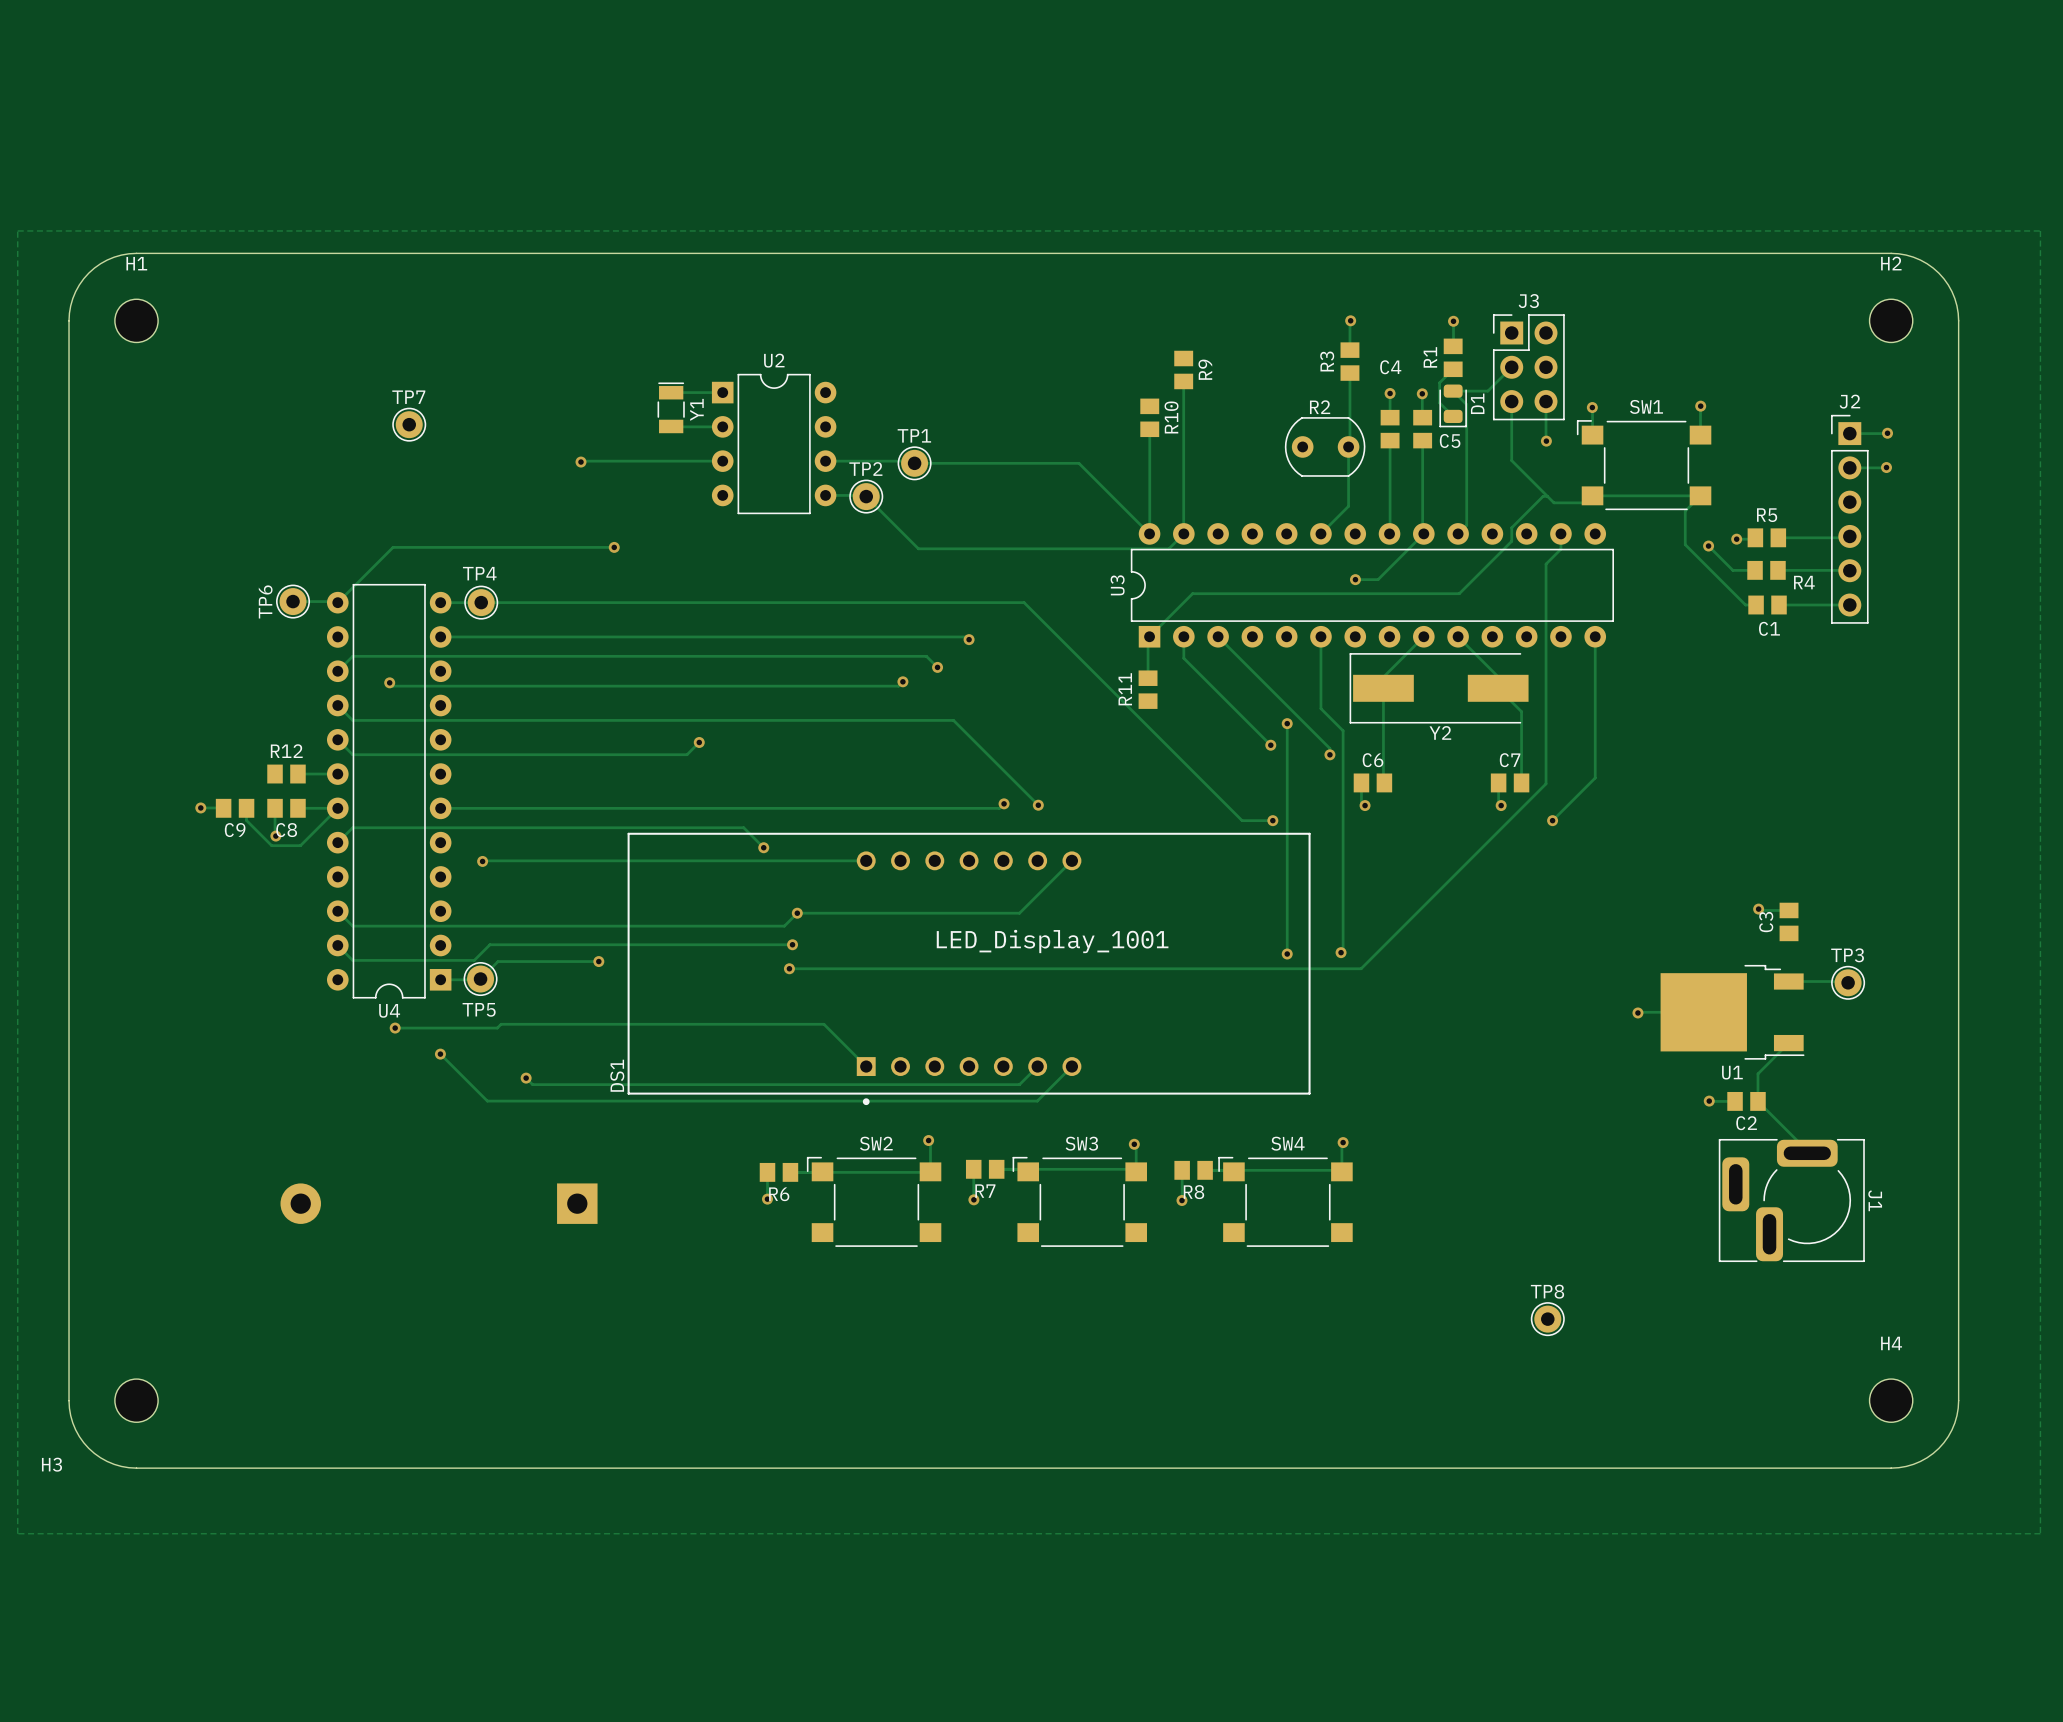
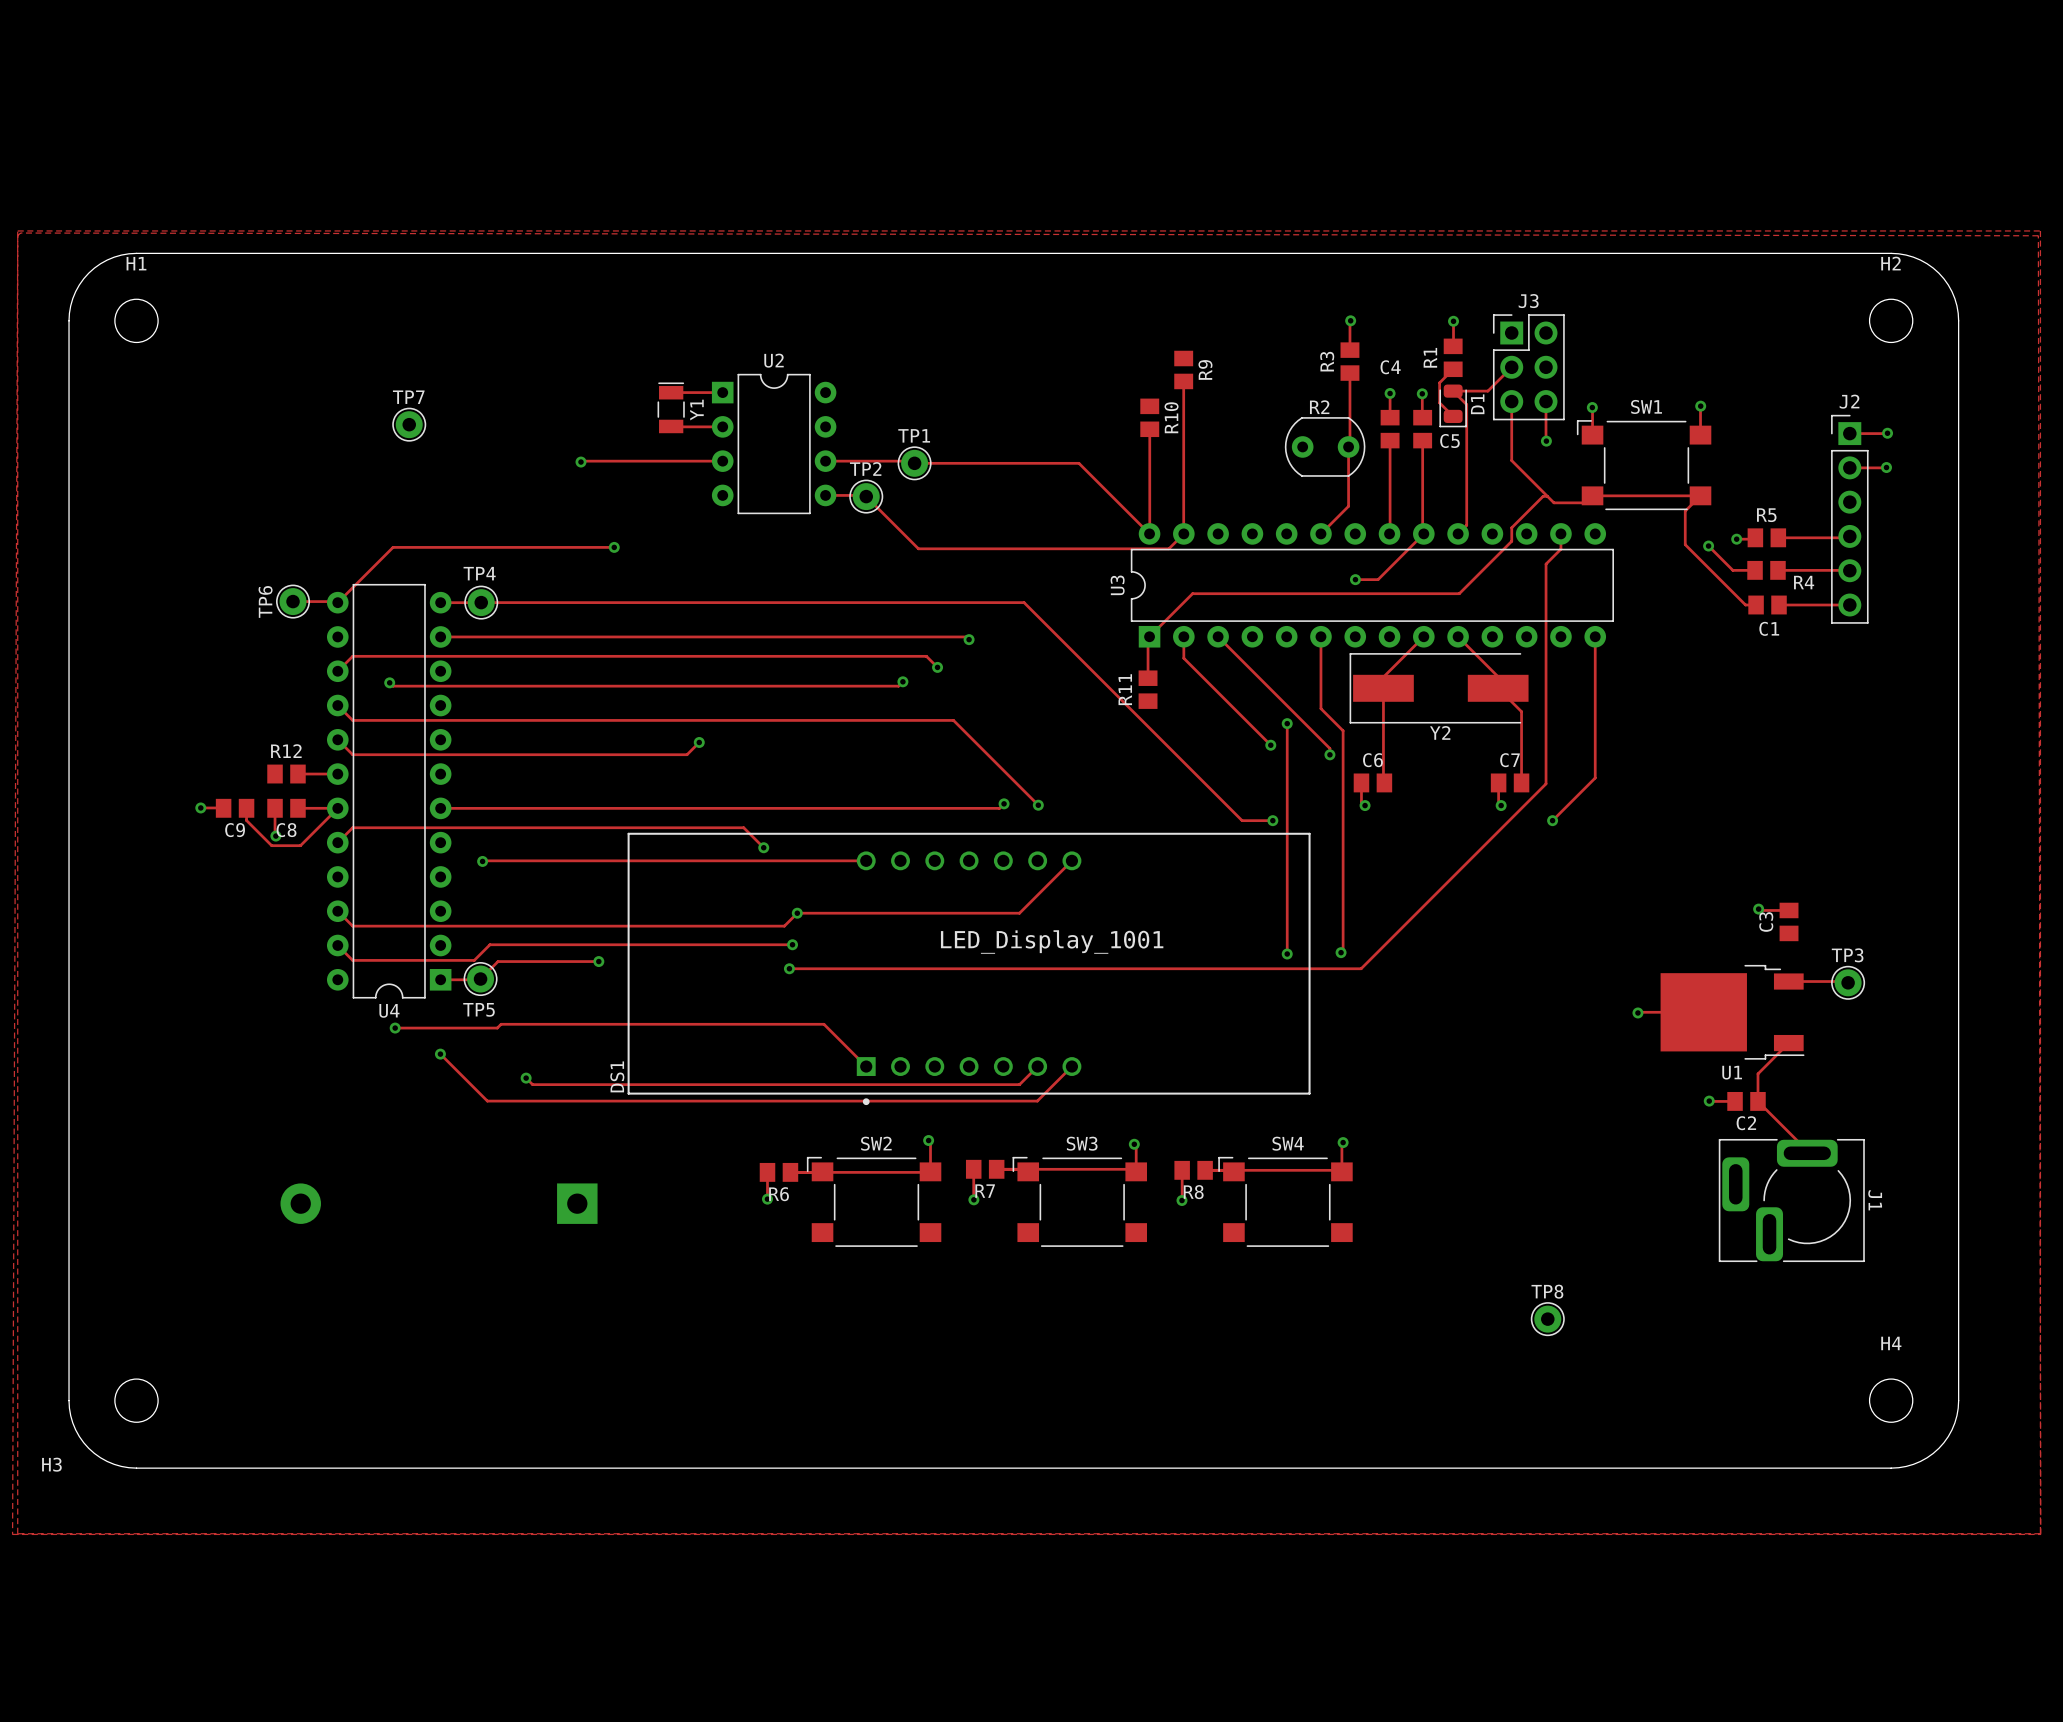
zone outline: none -> (20, 233) (2038, 235) (2040, 1534) (12, 1534) (17, 235) (20, 233)

